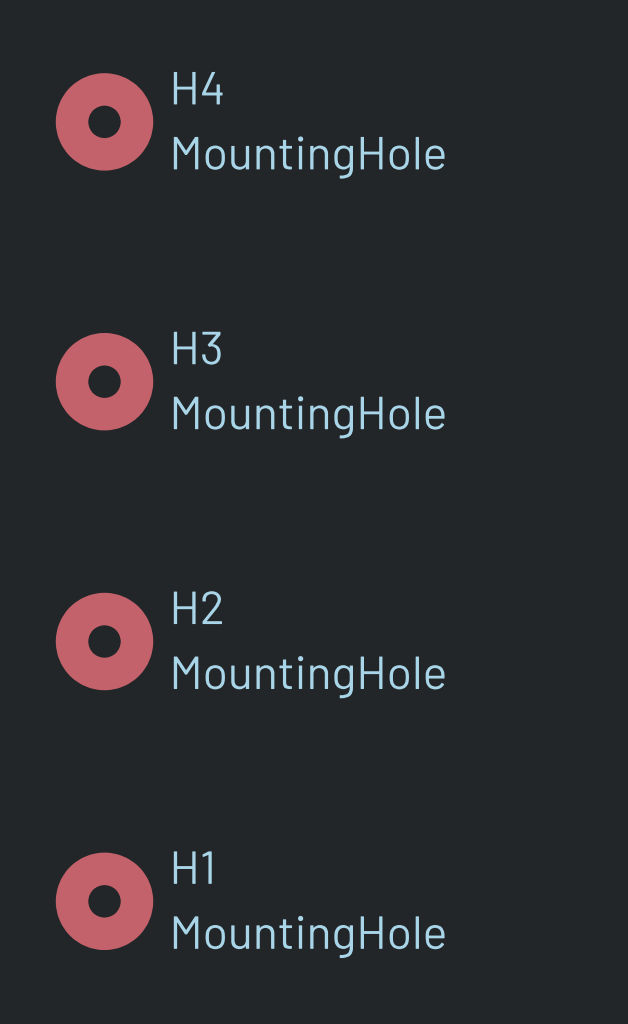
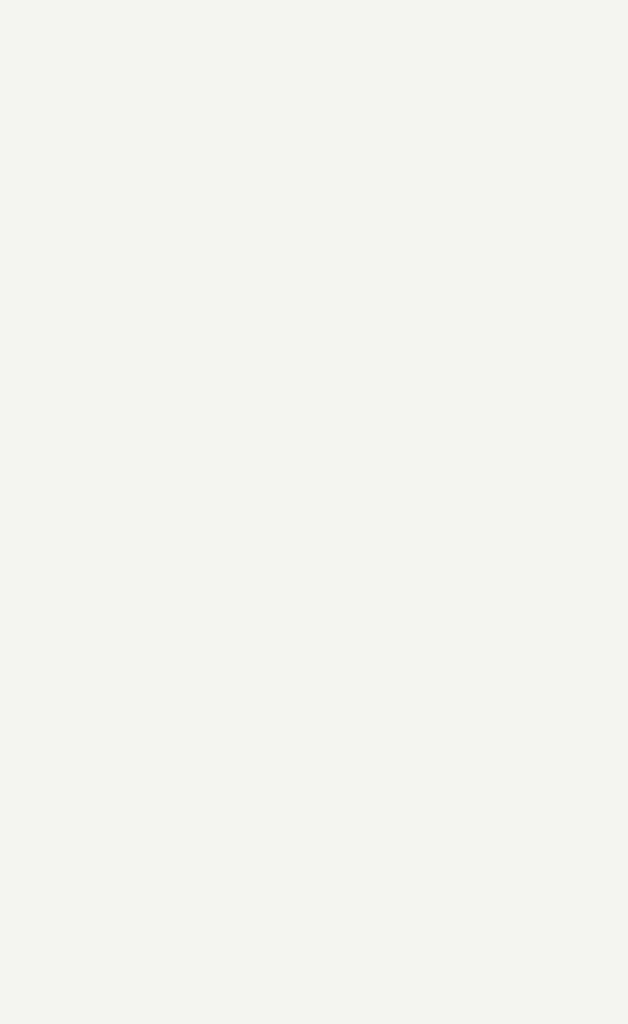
H4: MountingHole (104, 121) -> none
H3: MountingHole (104, 381) -> none
H2: MountingHole (104, 641) -> none
H1: MountingHole (104, 901) -> none

